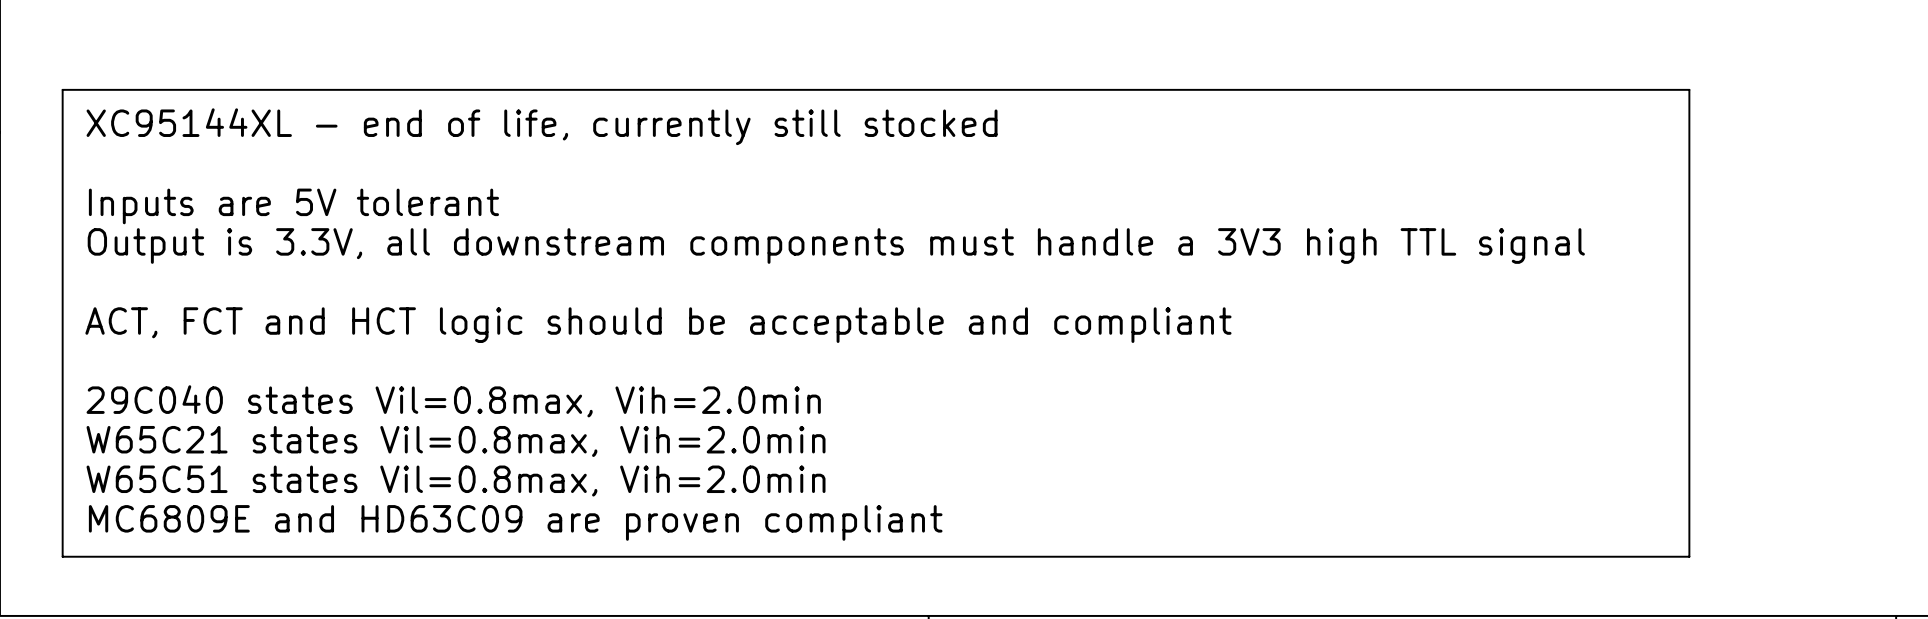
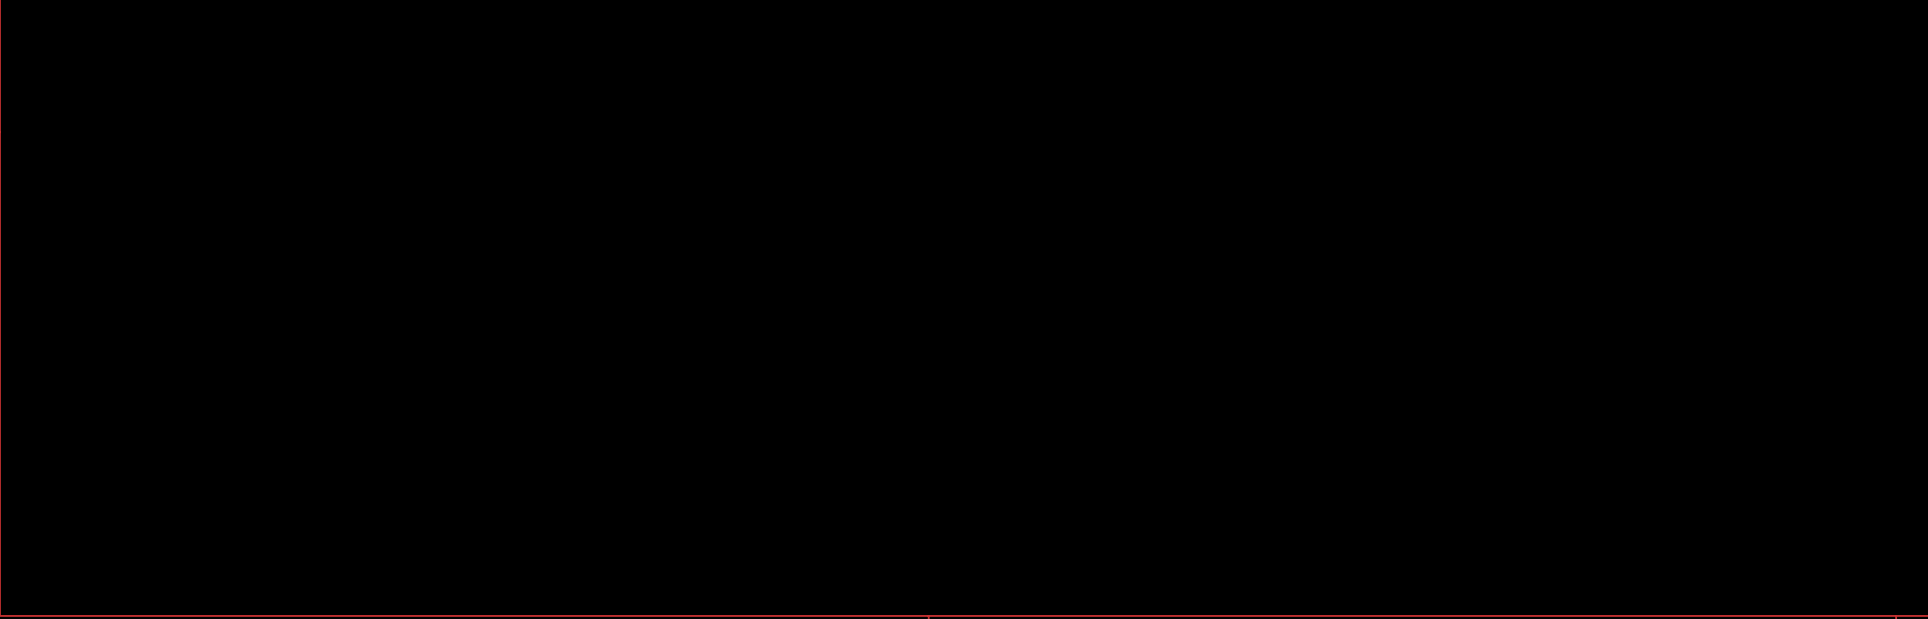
line: (62, 89) (1689, 89) (1689, 556) (62, 556) (62, 89) -> none
text: XC95144XL - end of life, currently still stocked (542, 126) -> none
text: Inputs are 5V tolerant (293, 206) -> none
text: Output is 3.3V, all downstream components must handle a 3V3 high TTL signal (836, 246) -> none
text: ACT, FCT and HCT logic should be acceptable and compliant (658, 325) -> none
text: 29C040 states Vil=0.8max, Vih=2.0min (453, 401) -> none
text: W65C21 states Vil=0.8max, Vih=2.0min (456, 441) -> none
text: W65C51 states Vil=0.8max, Vih=2.0min (456, 481) -> none
text: MC6809E and HD63C09 are proven compliant (515, 522) -> none

